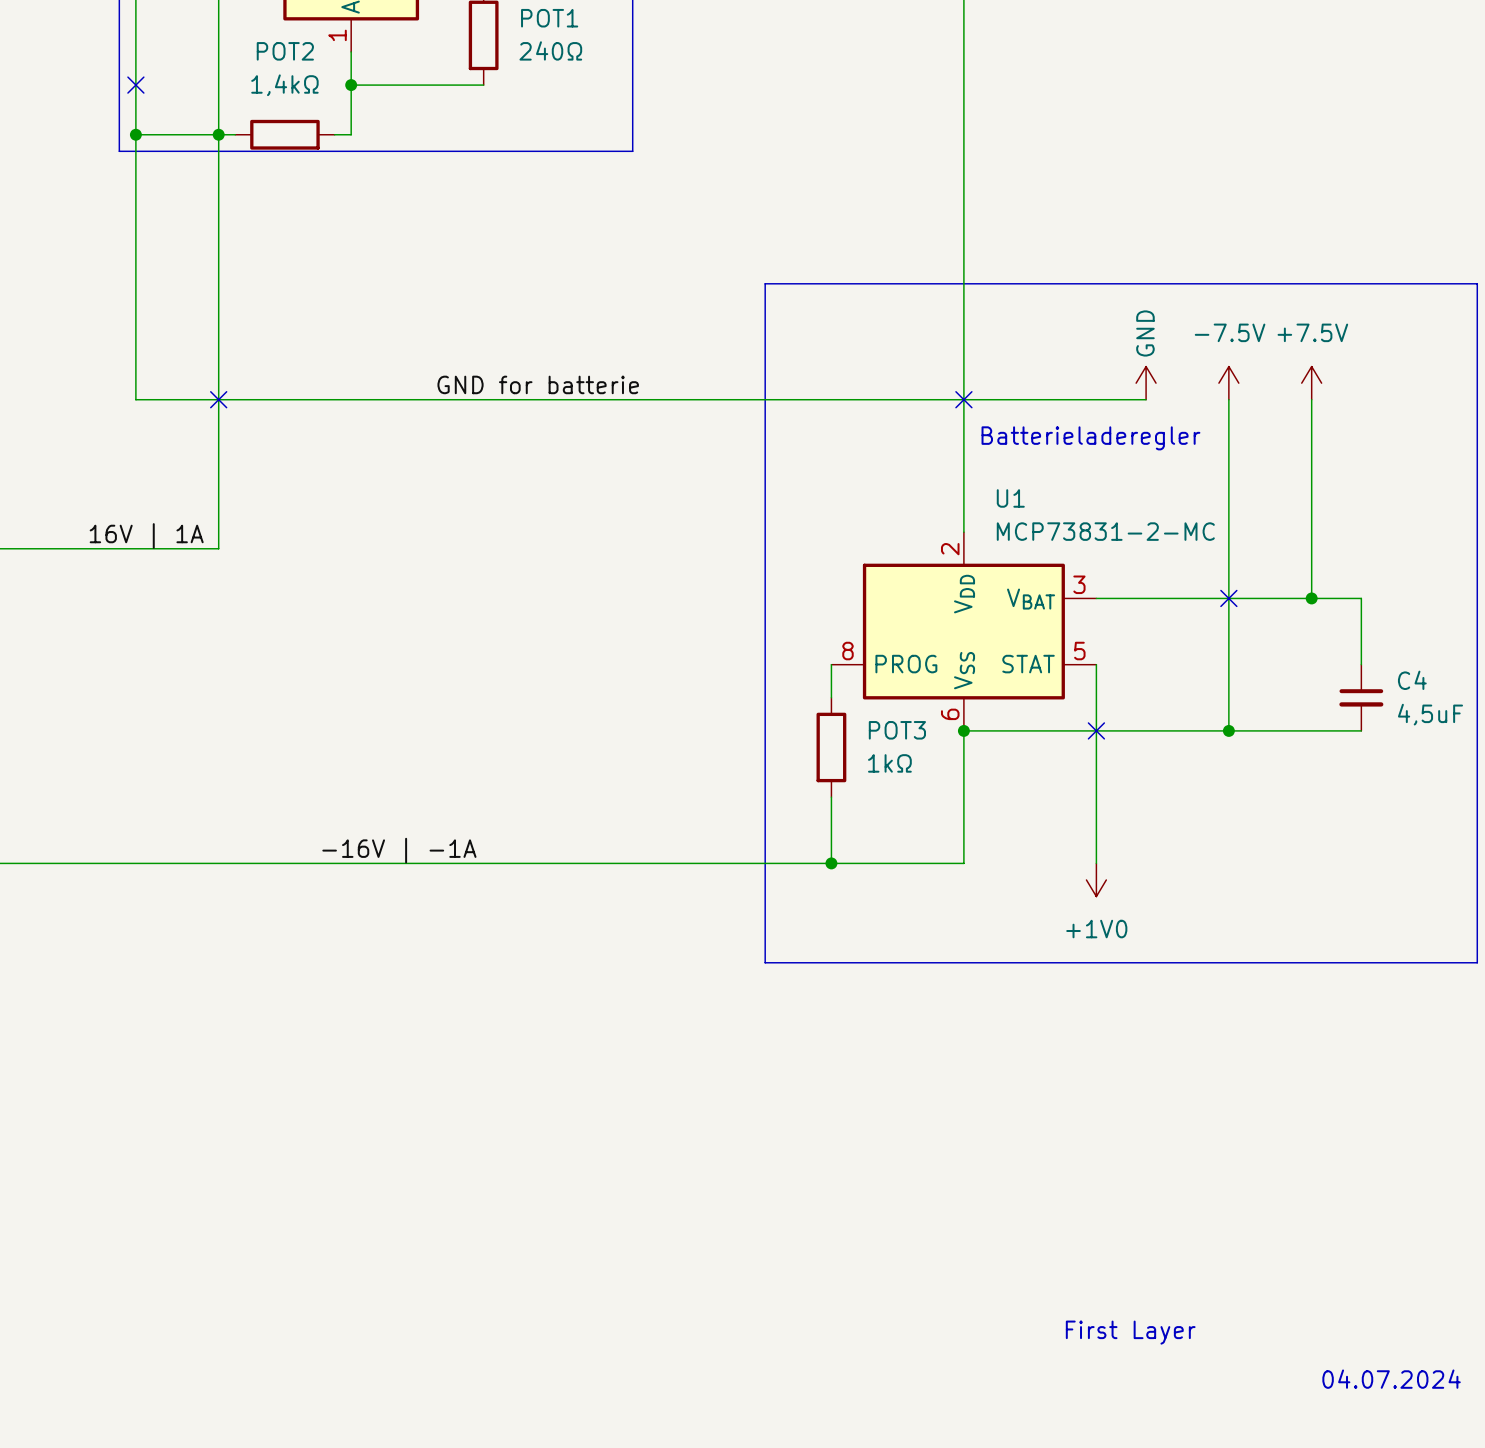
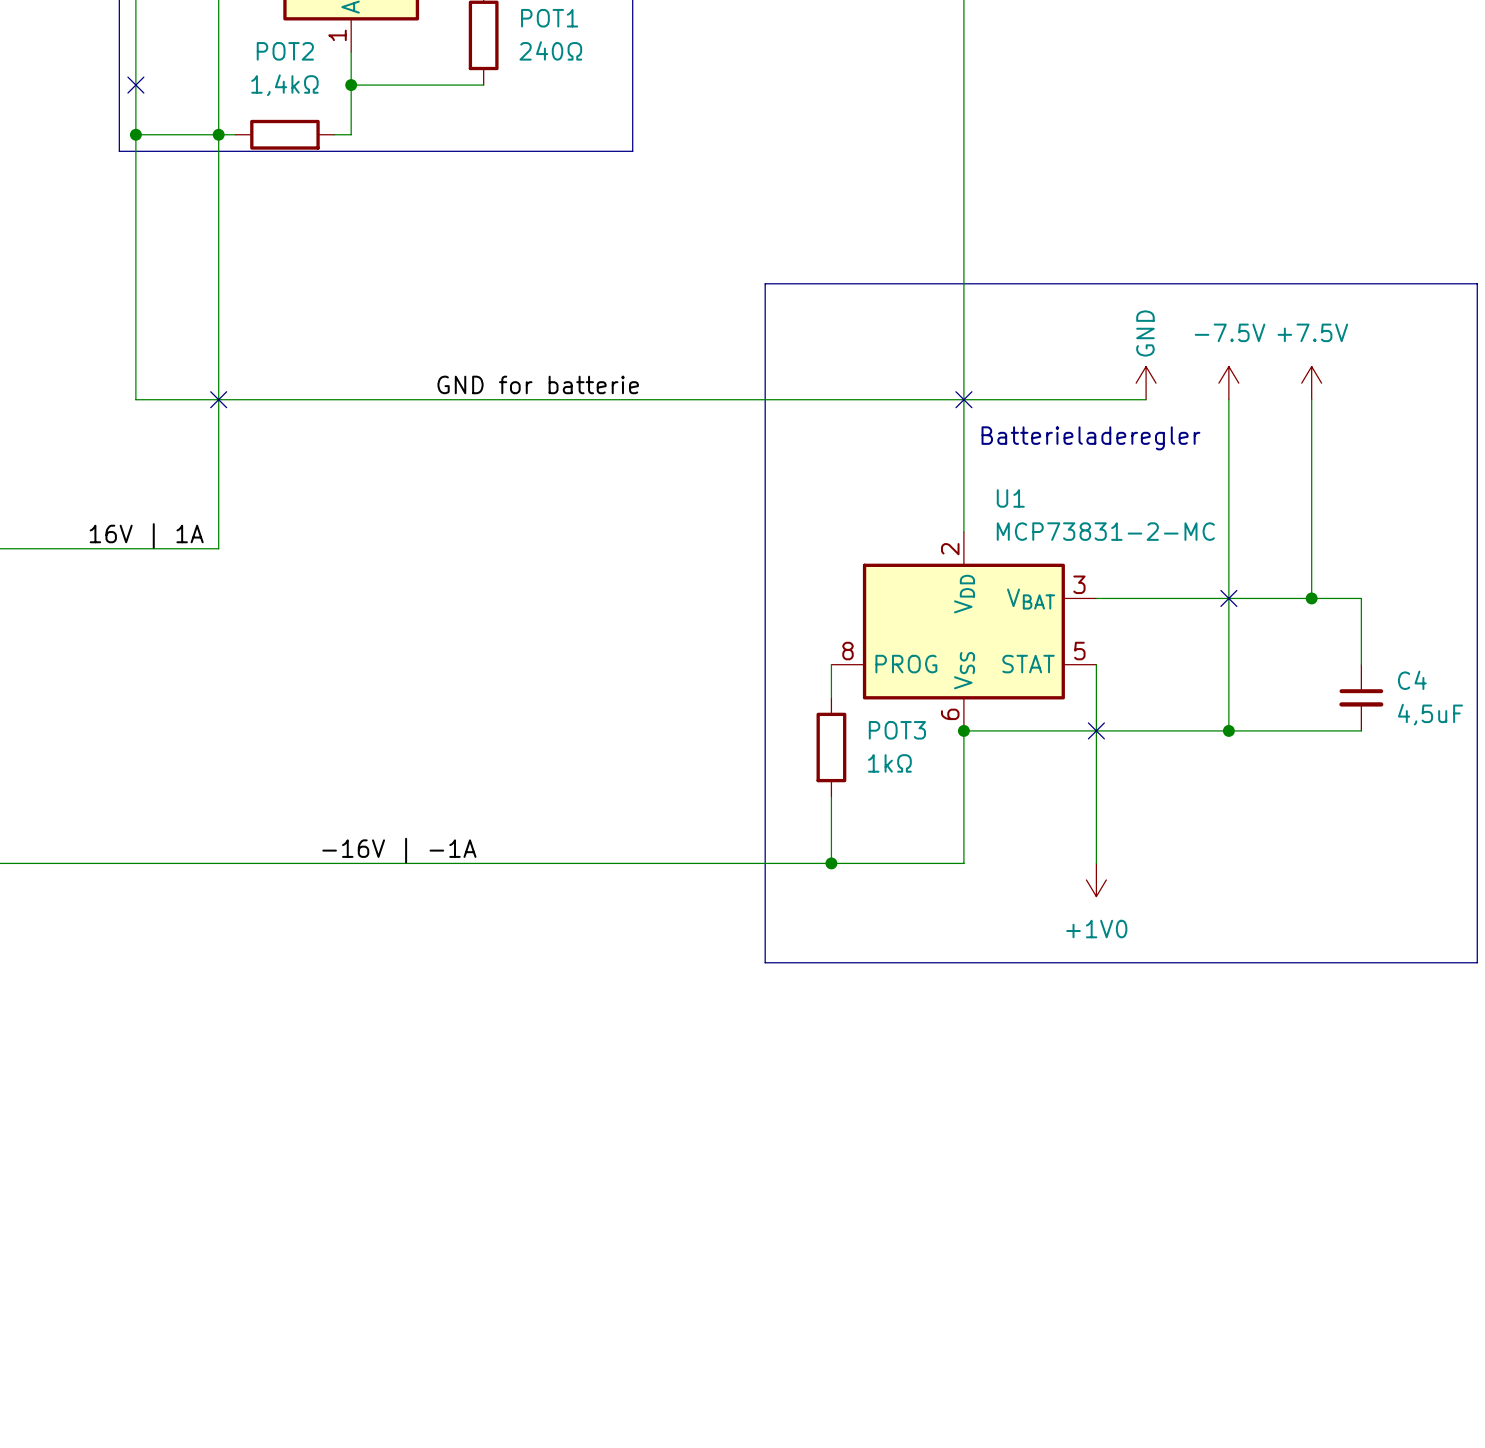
text: First Layer (1130, 1332) -> none
text: 04.07.2024 (1391, 1379) -> none

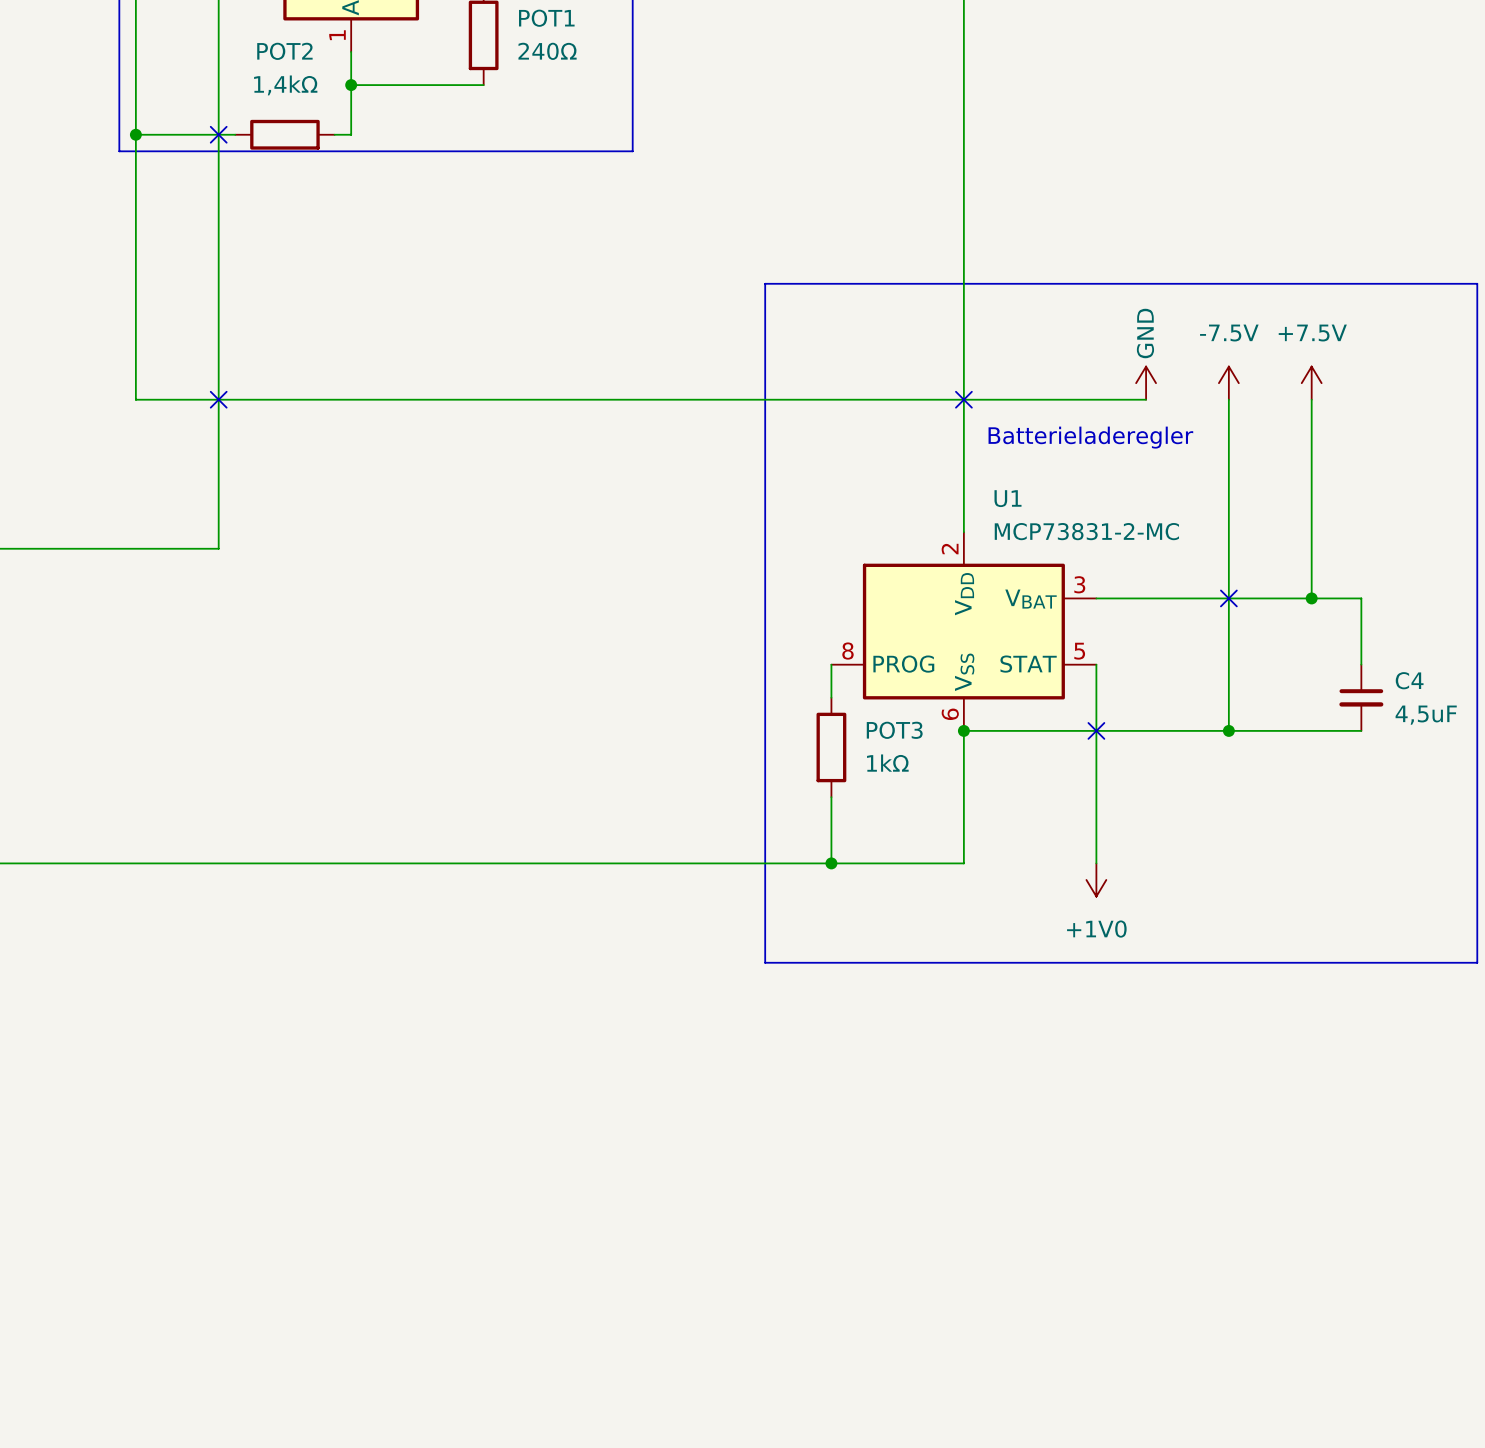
no-connect mark: (135, 85) -> none
junction: (218, 134) -> none
no-connect mark: none -> (218, 134)
label: GND for batterie (538, 384) -> none
label: 16V | 1A (146, 535) -> none
label: -16V | -1A (399, 850) -> none

